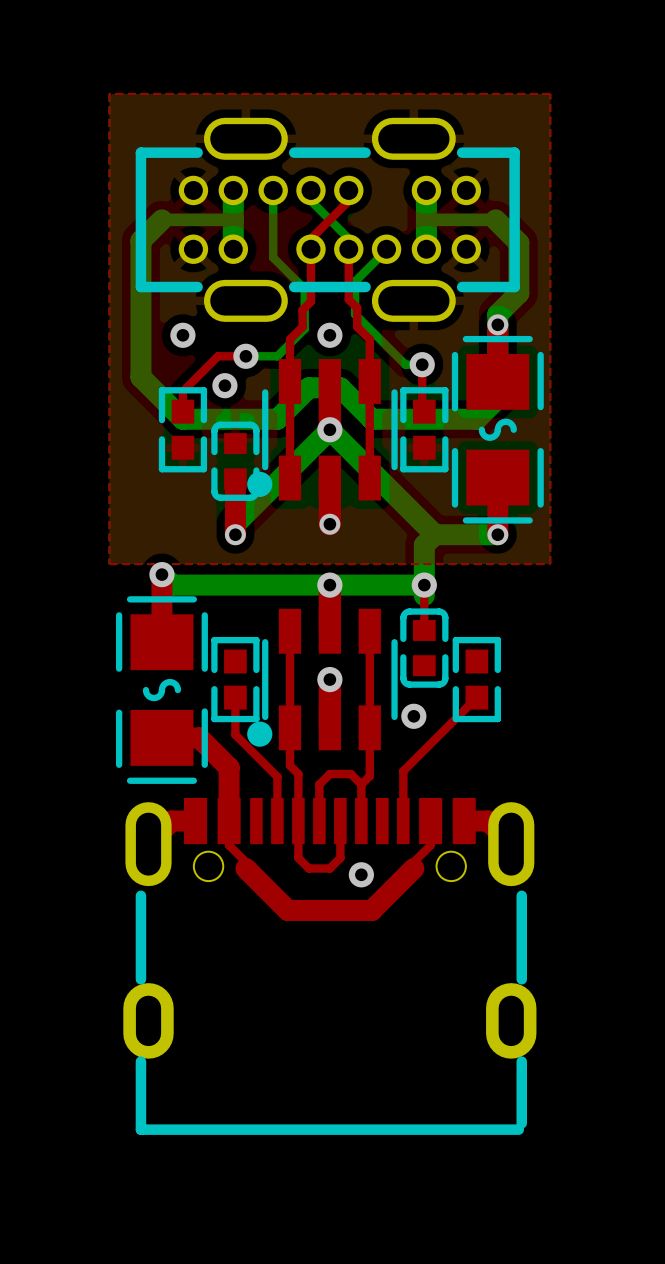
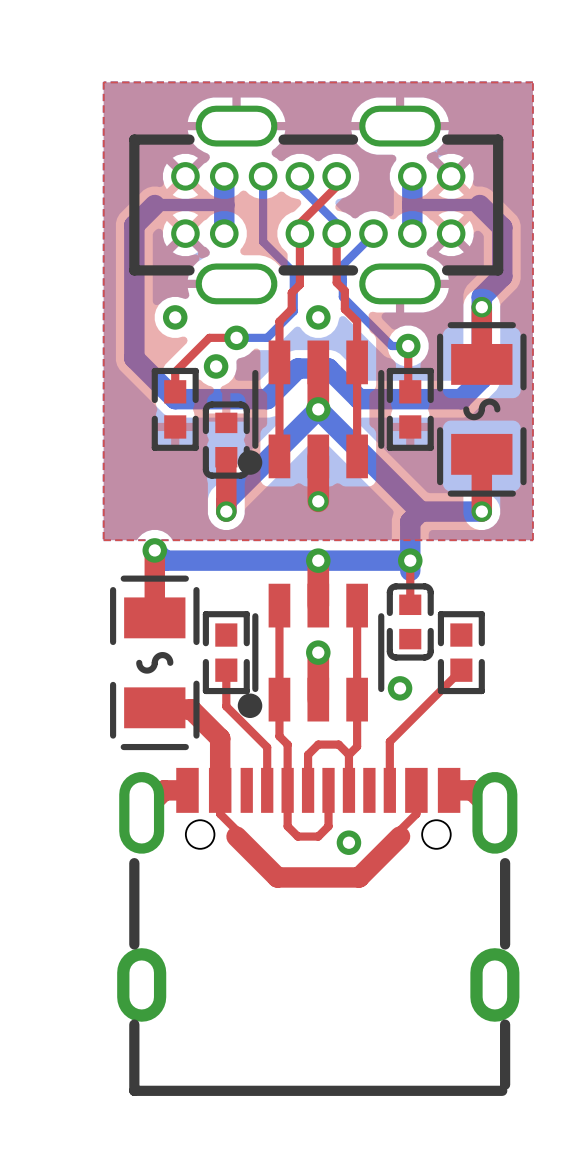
part footprint: [451, 335, 544, 524] -> [437, 322, 527, 497]
part footprint: [115, 596, 208, 784] -> [110, 575, 200, 751]

